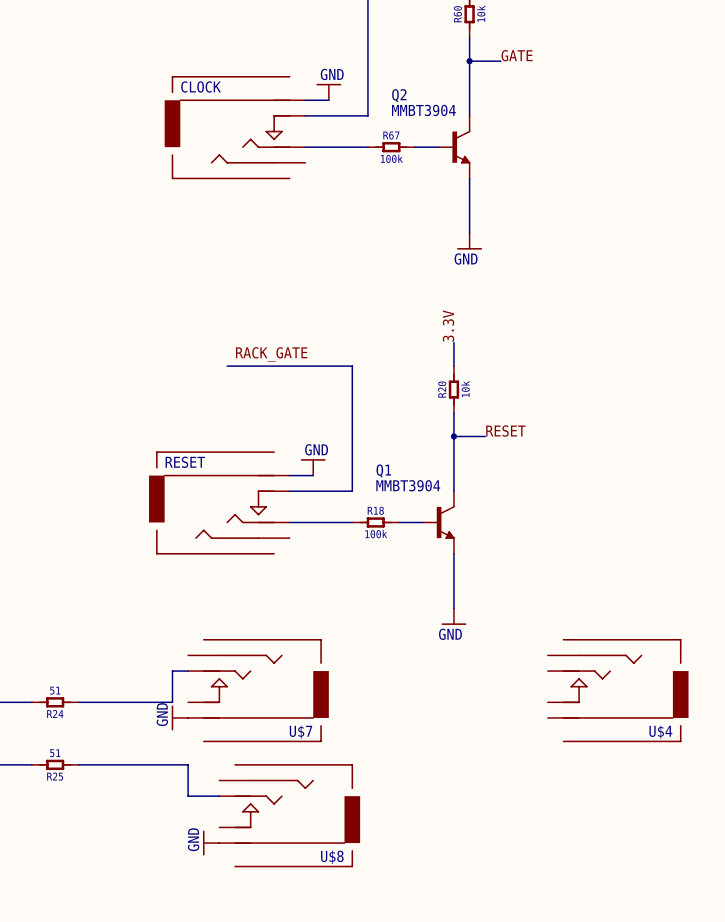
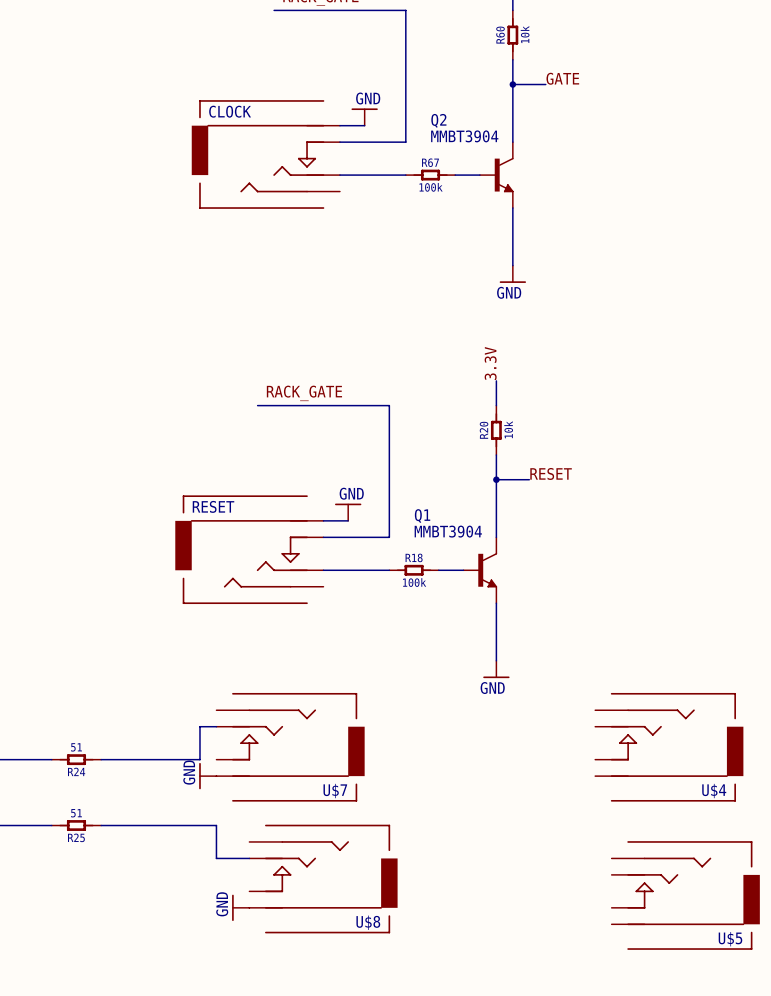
U$5: none -> (685, 895)

